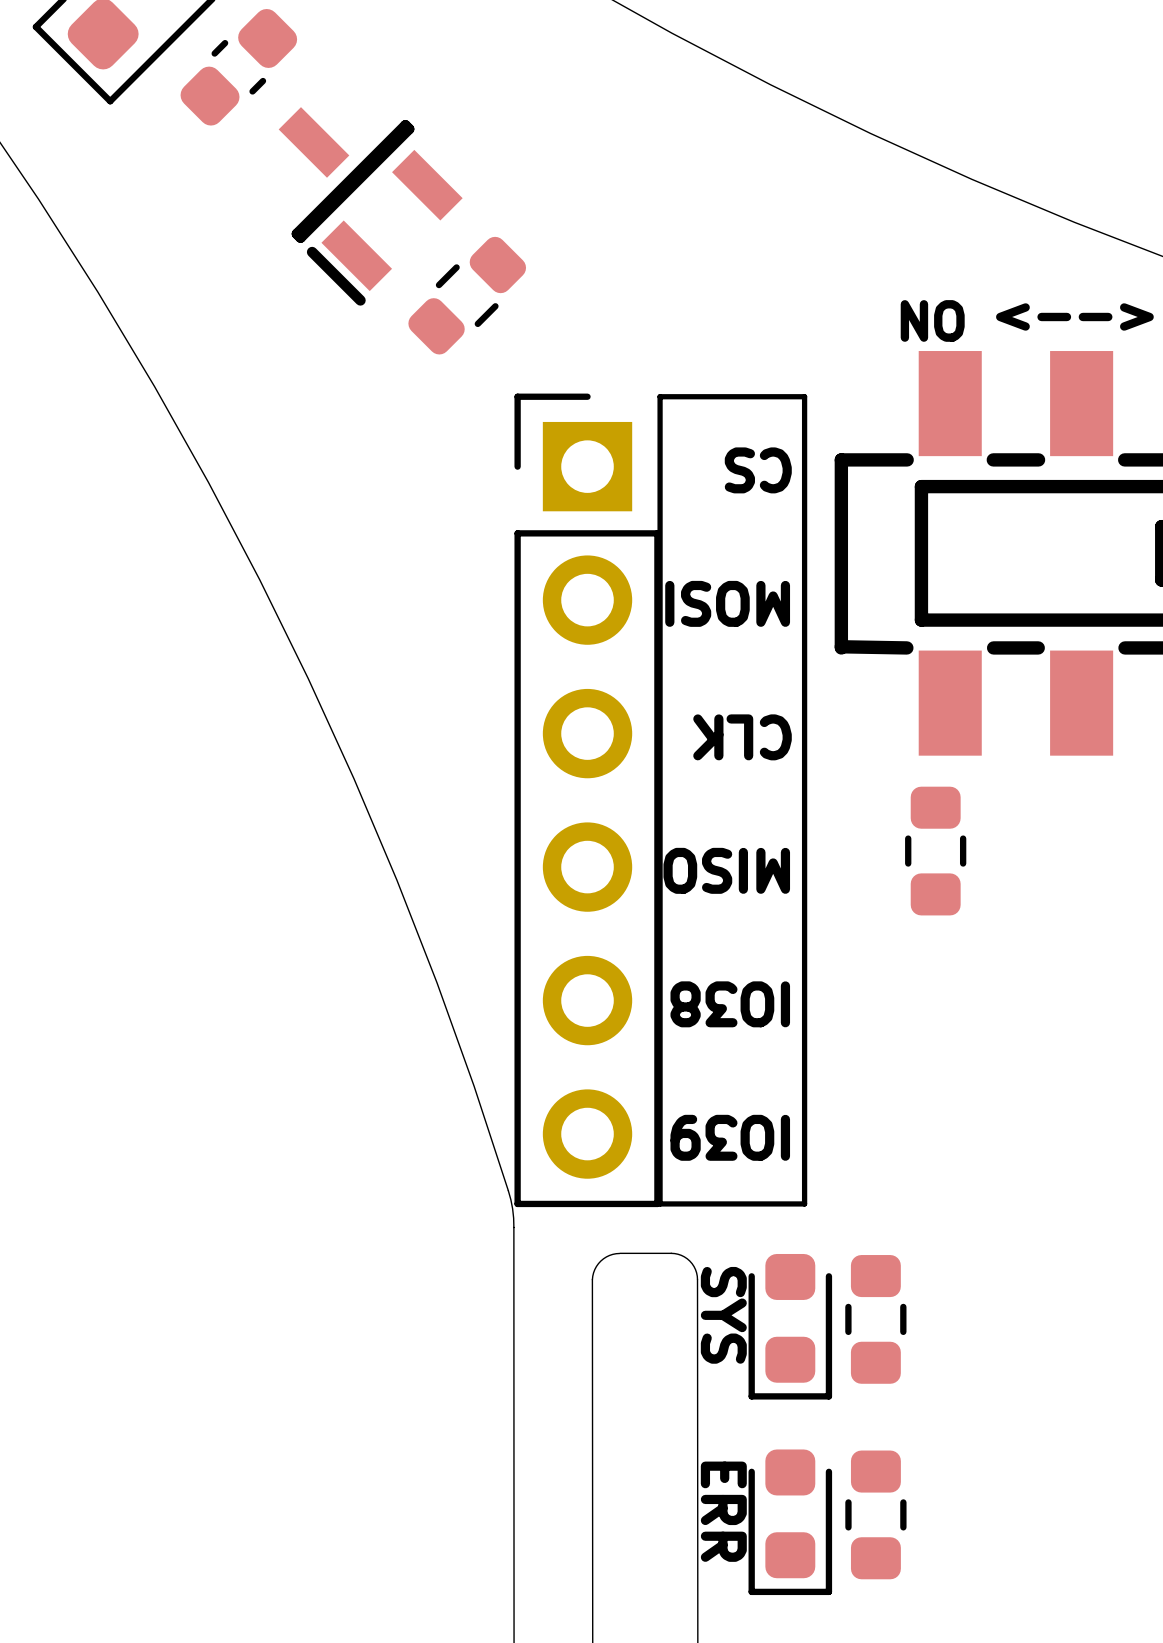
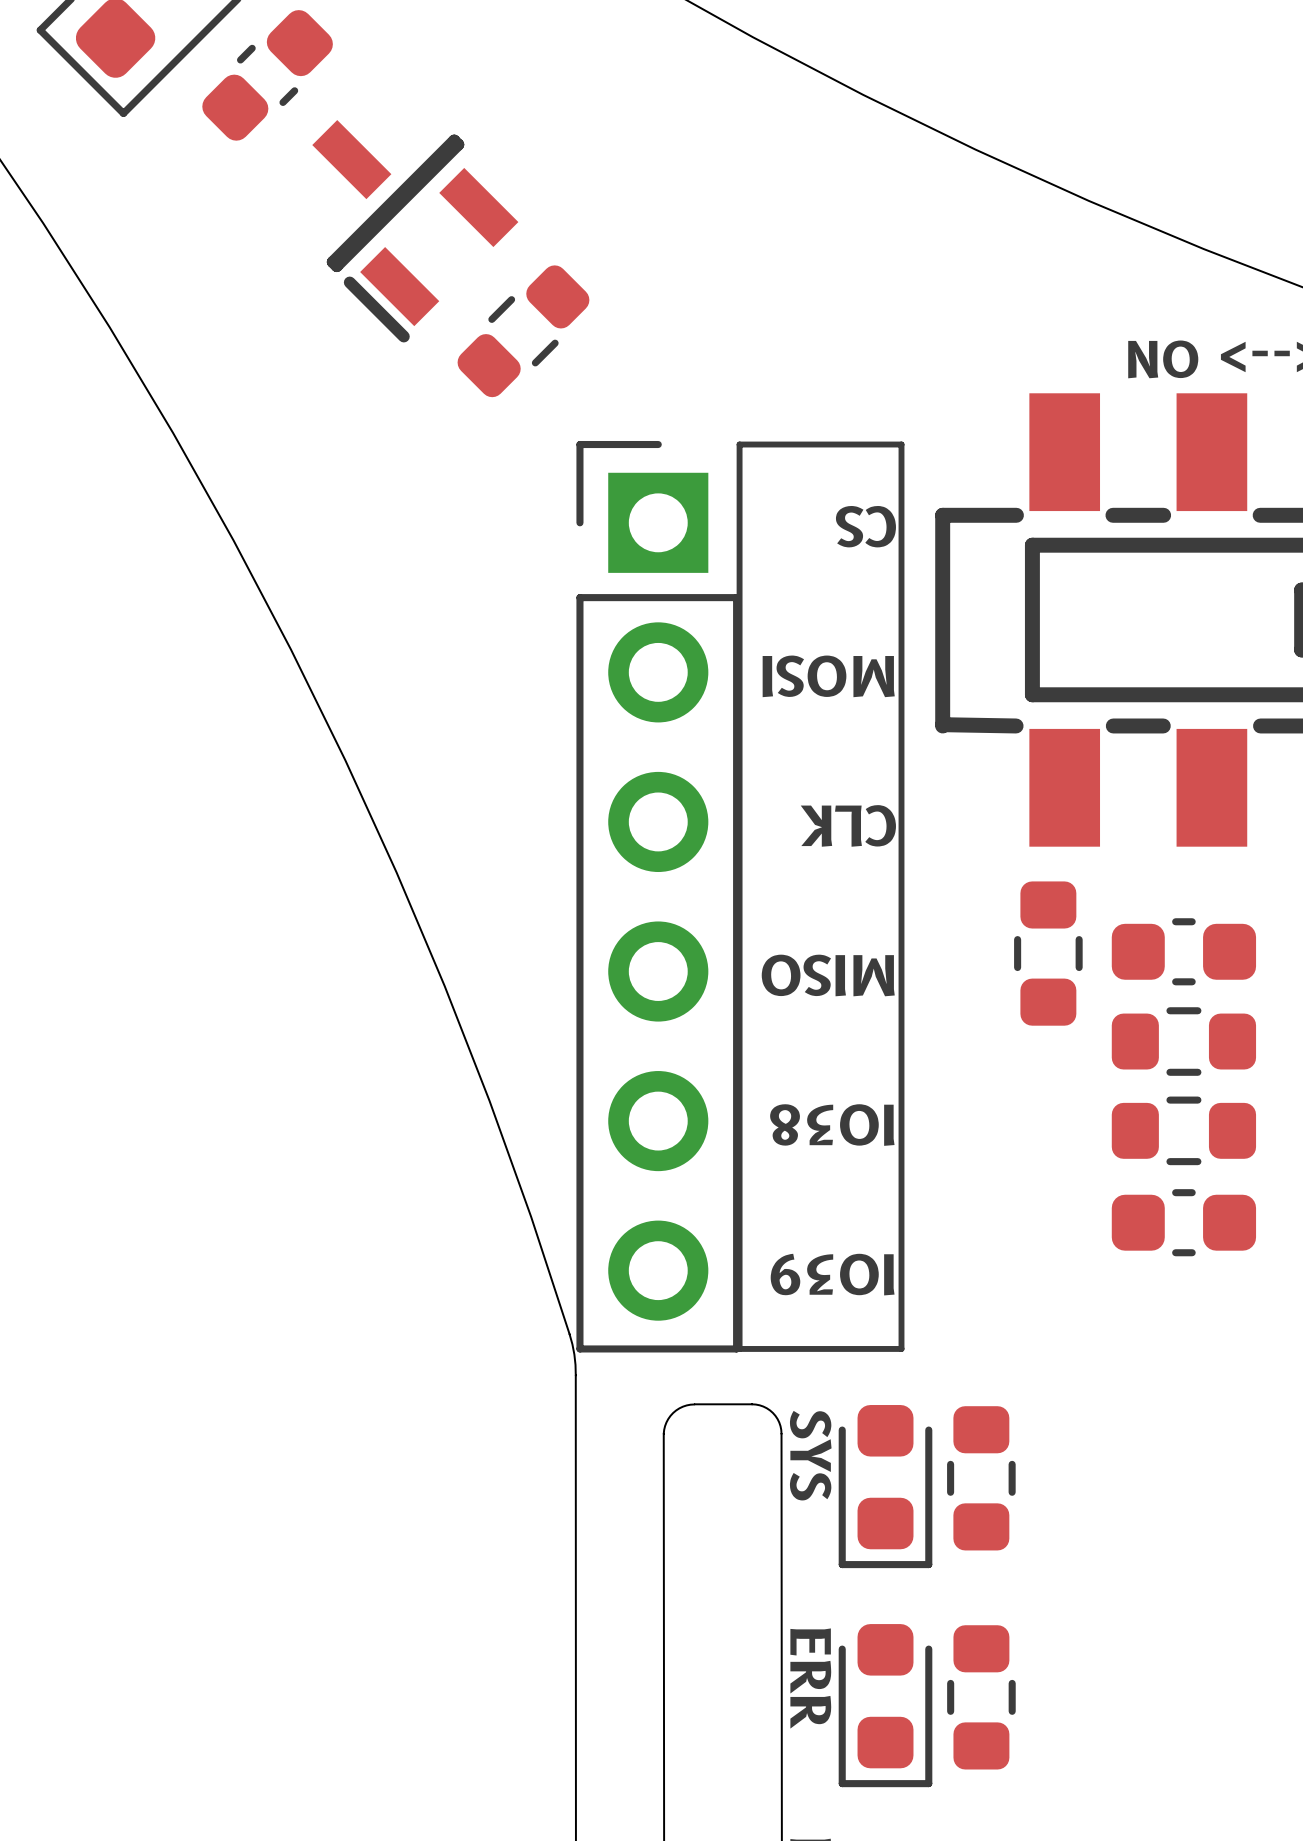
part: none -> (1183, 951)
part: none -> (1183, 1041)
part: none -> (1183, 1130)
part: none -> (1183, 1222)

